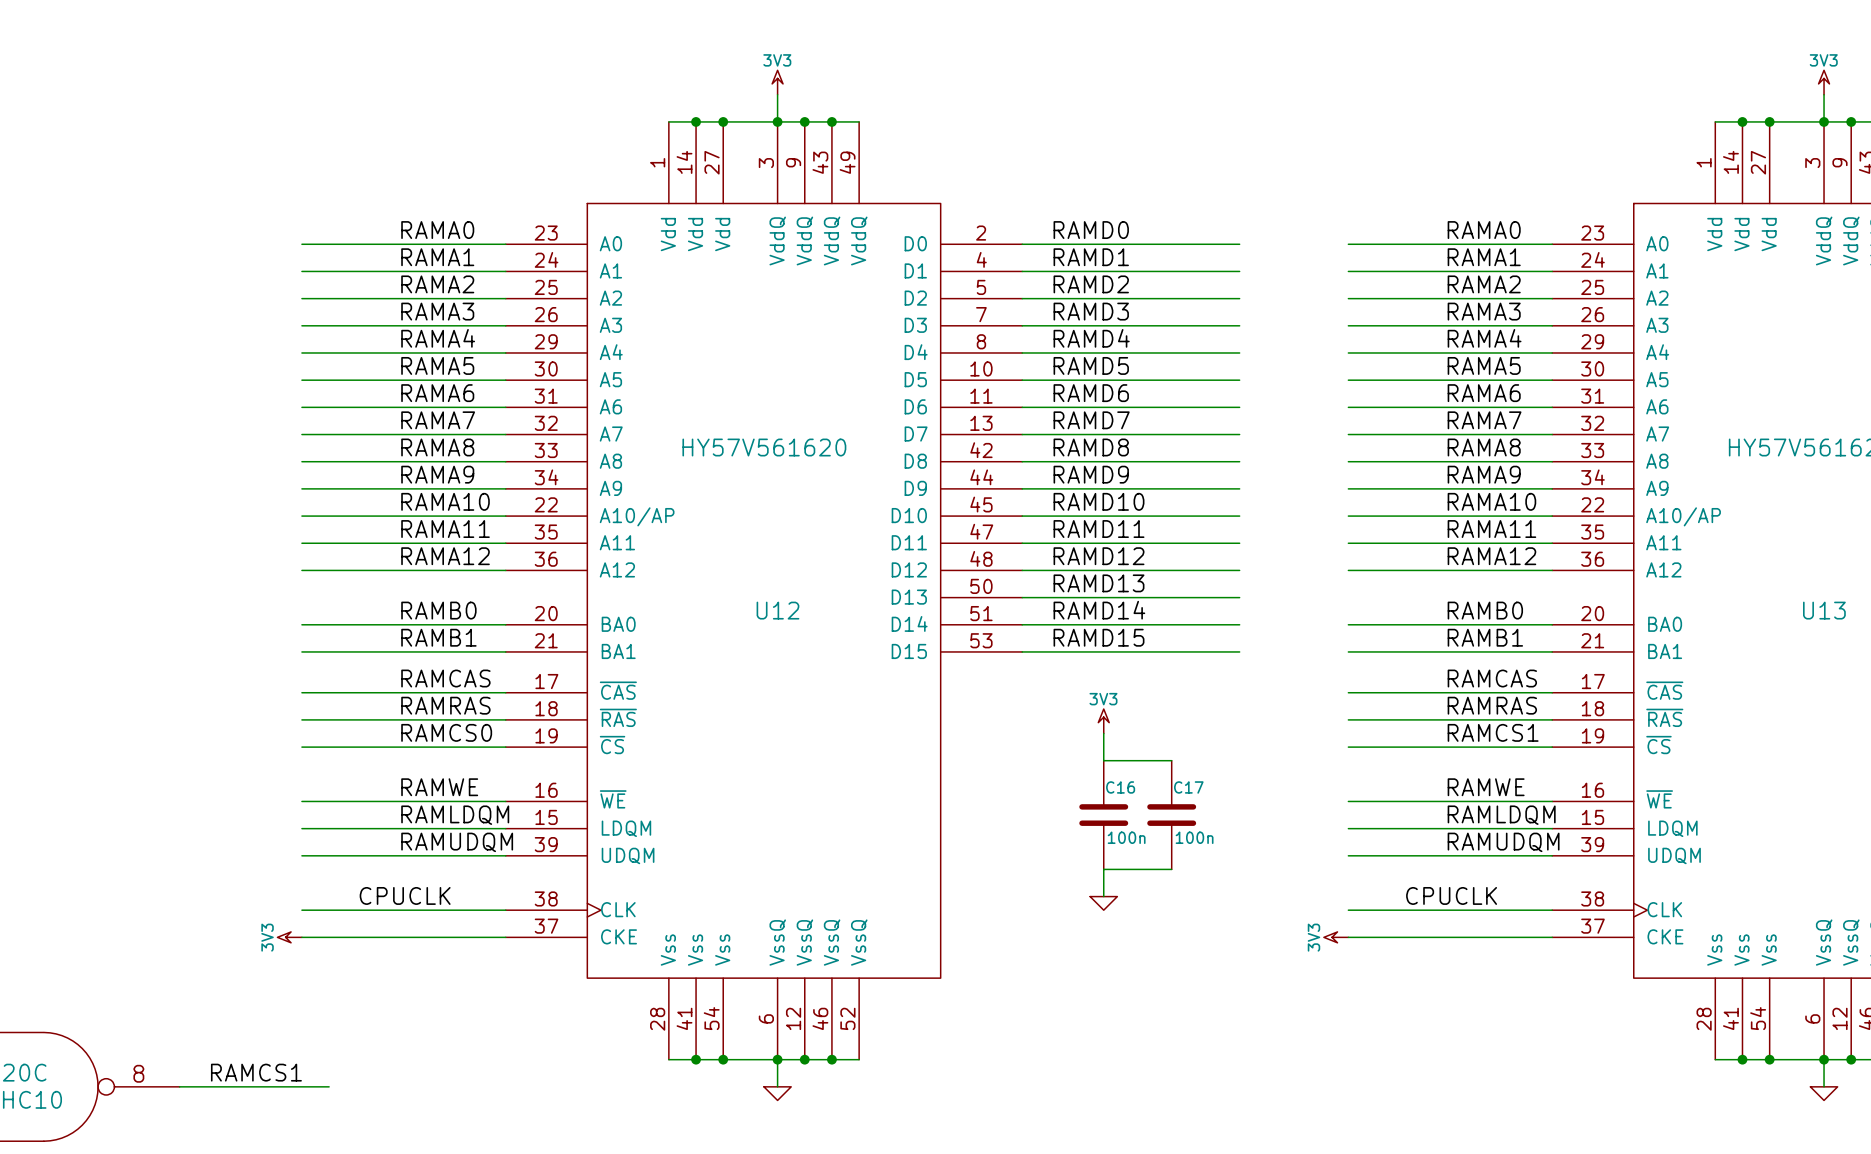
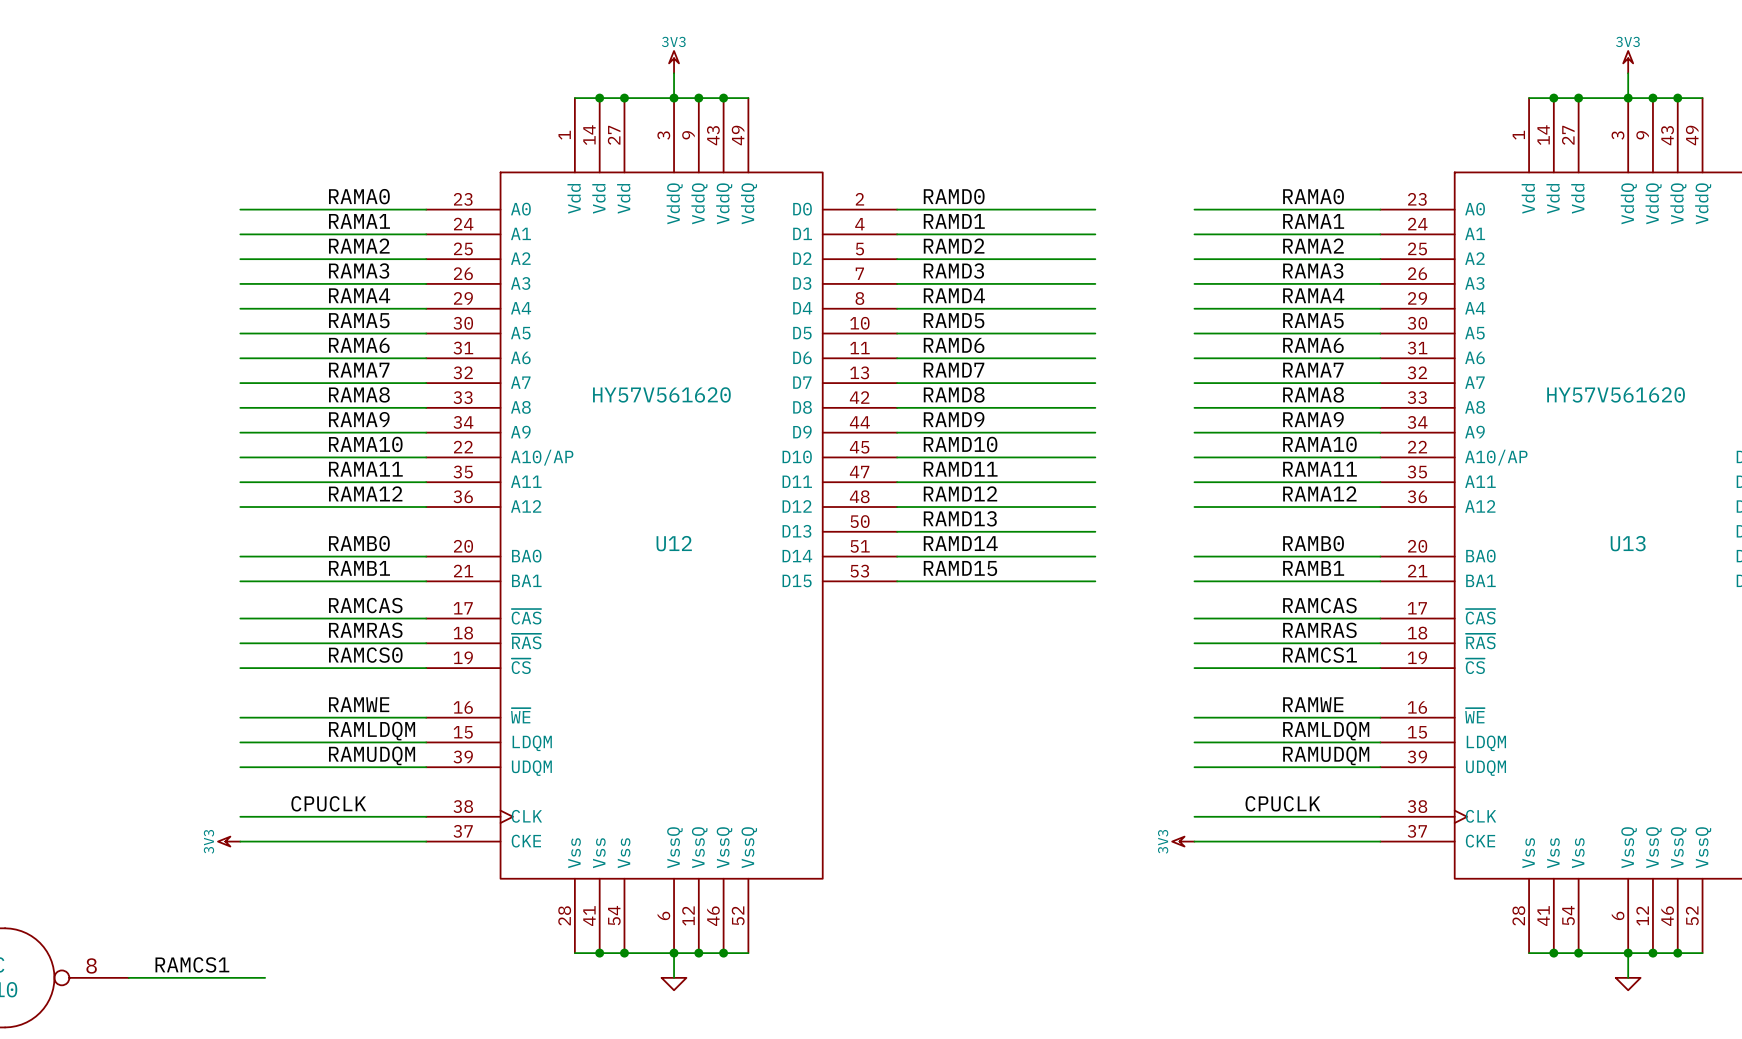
power symbol: 3V3 (1103, 721) -> none
wire: (1103, 733) (1103, 760) (1171, 760) -> none
C16: 100n (1103, 815) -> none
C17: 100n (1171, 815) -> none
wire: (1171, 869) (1103, 869) (1103, 896) -> none
power symbol: (1103, 903) -> none

